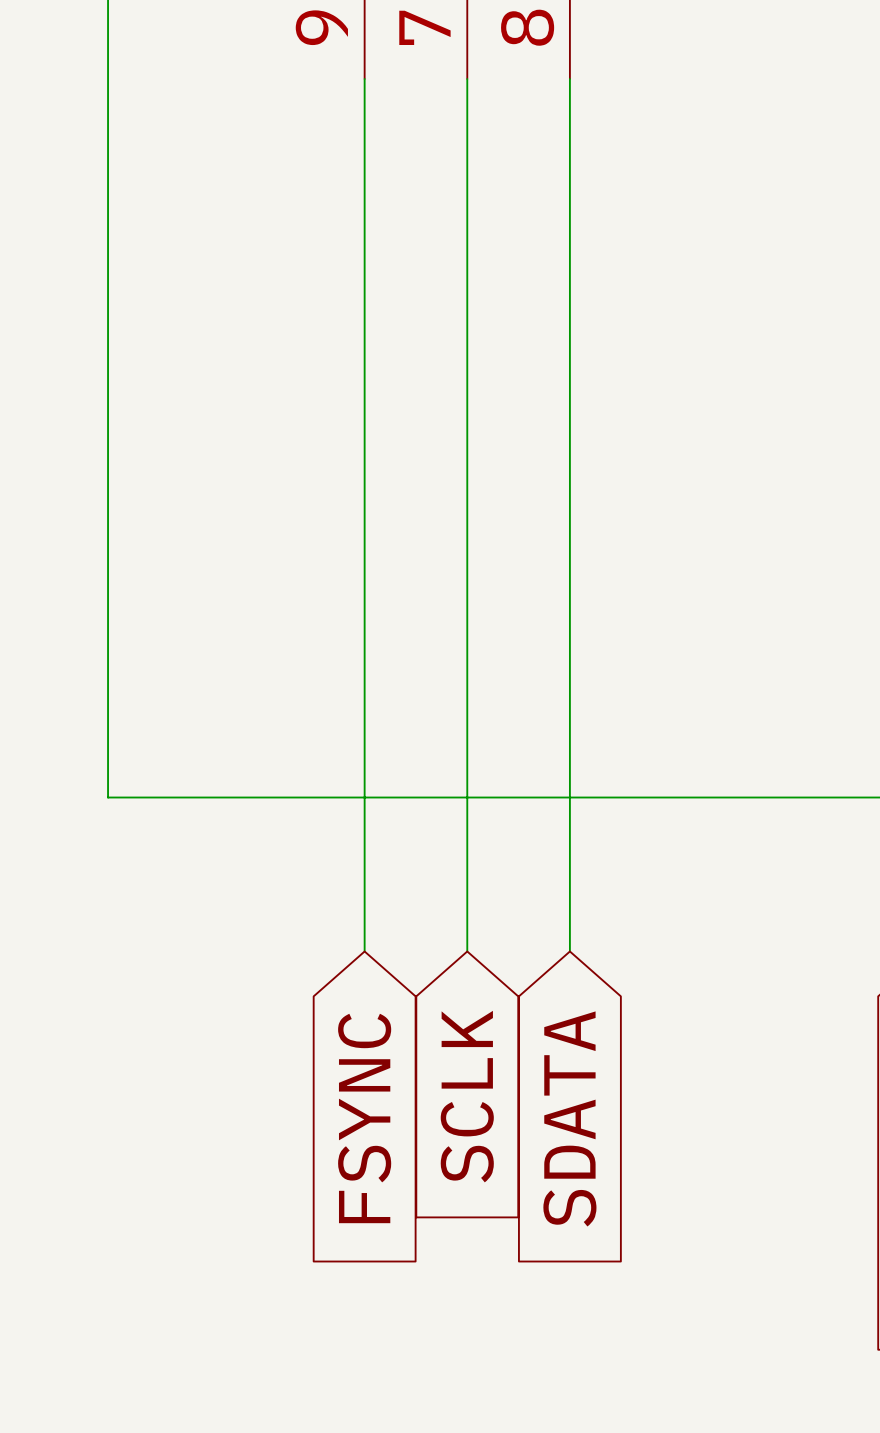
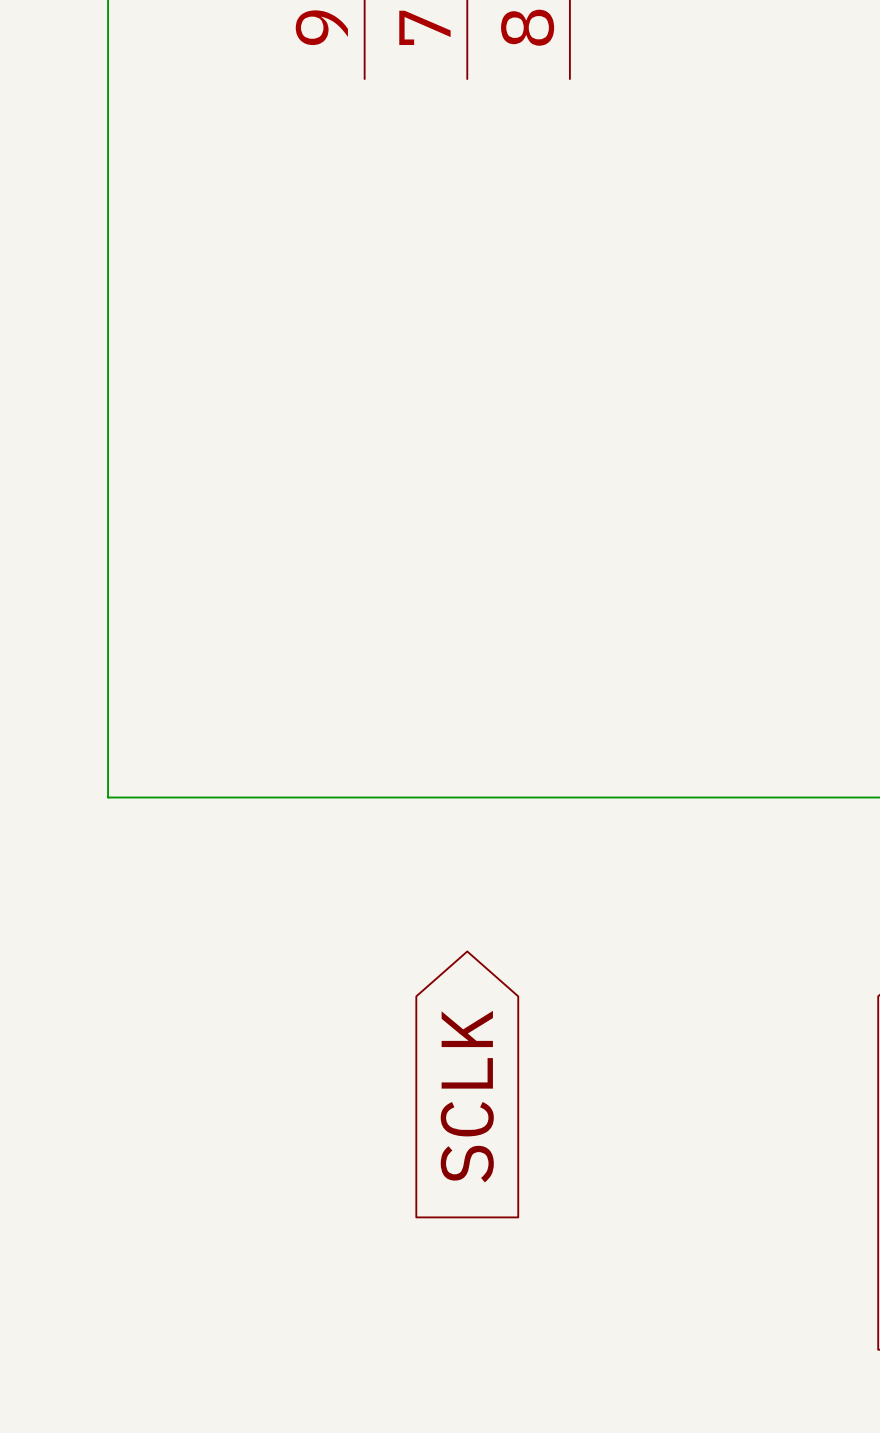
wire: (364, 79) (364, 951) -> none
wire: (467, 79) (467, 951) -> none
wire: (569, 79) (569, 951) -> none
global label: FSYNC (364, 1118) -> none
global label: SDATA (569, 1118) -> none

